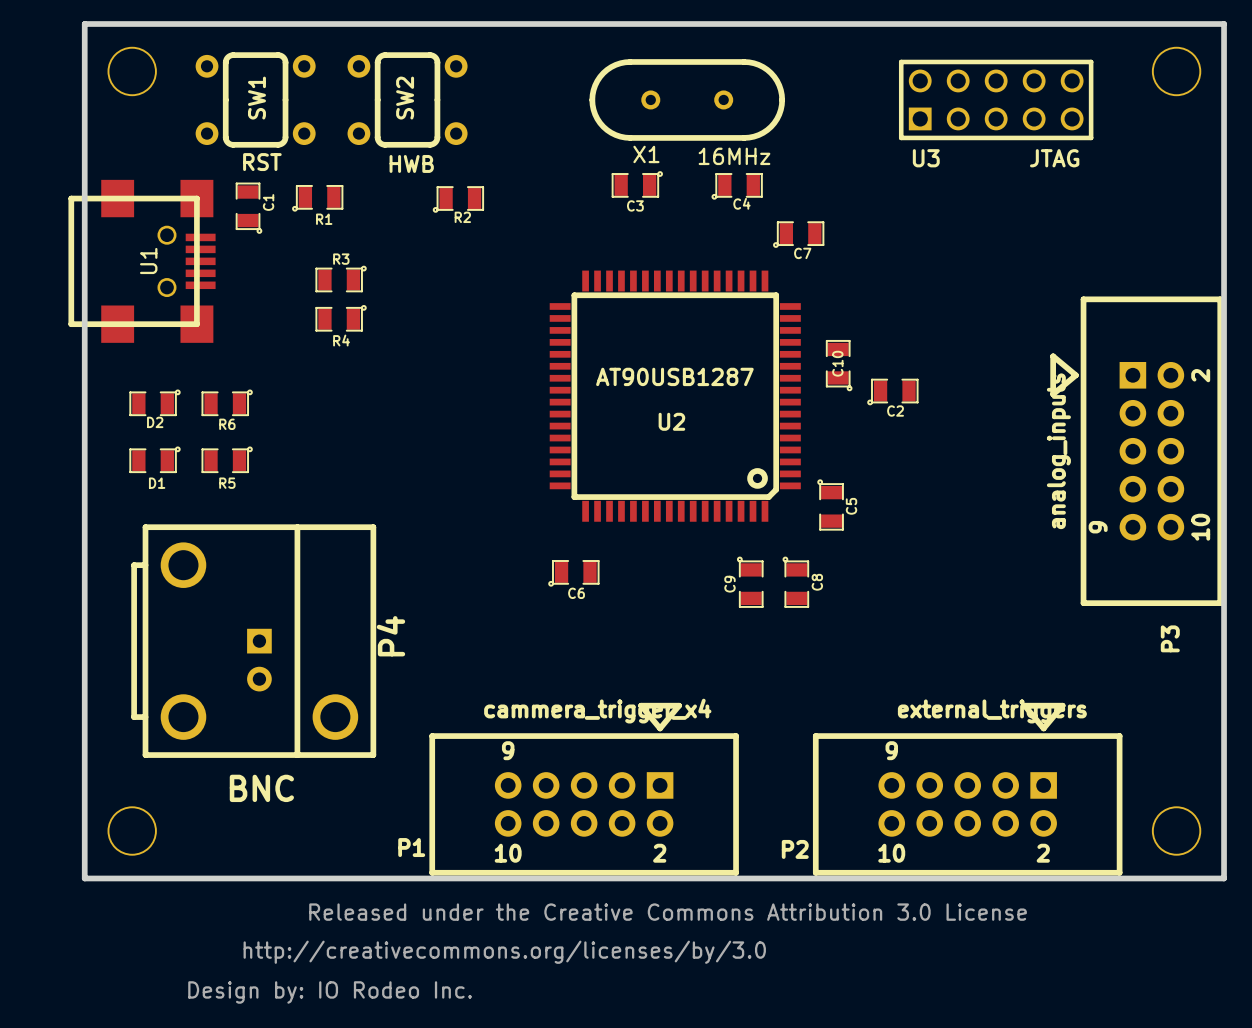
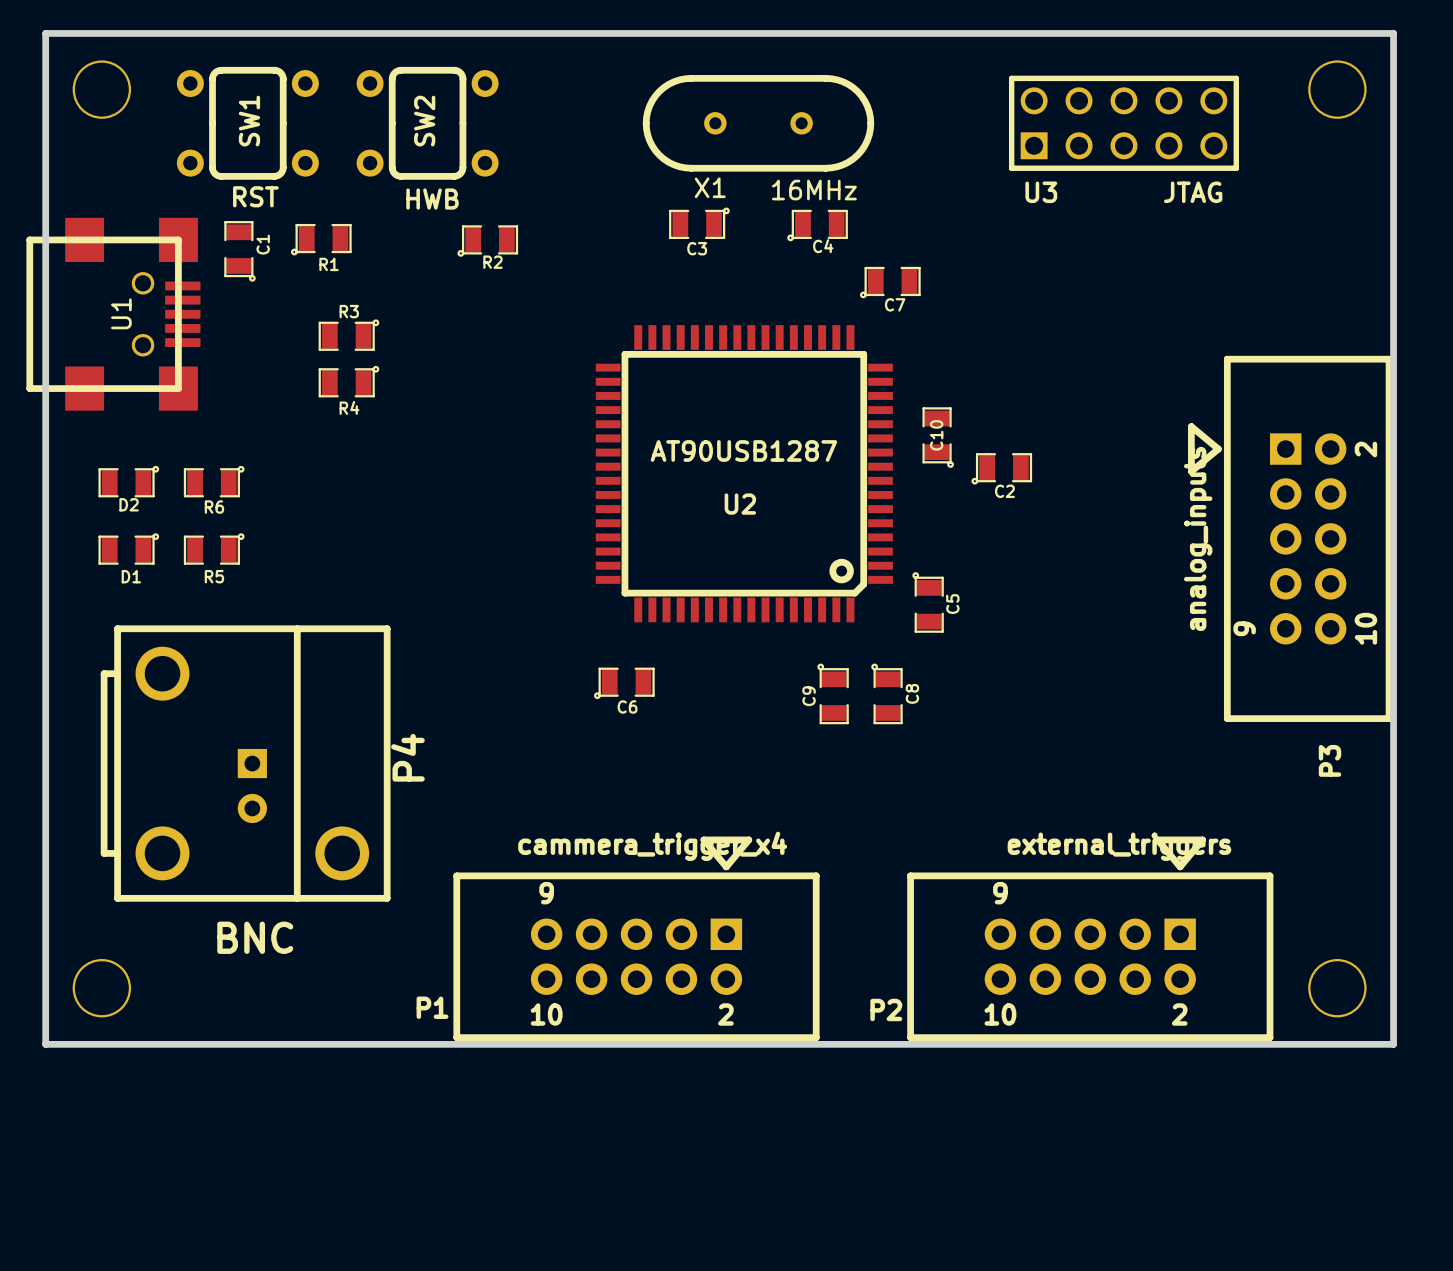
text: Released under the Creative Commons Attribution 3.0 License (668, 912) -> none
text: http://creativecommons.org/licenses/by/3.0 (504, 952) -> none
text: Design by: IO Rodeo Inc. (330, 992) -> none

